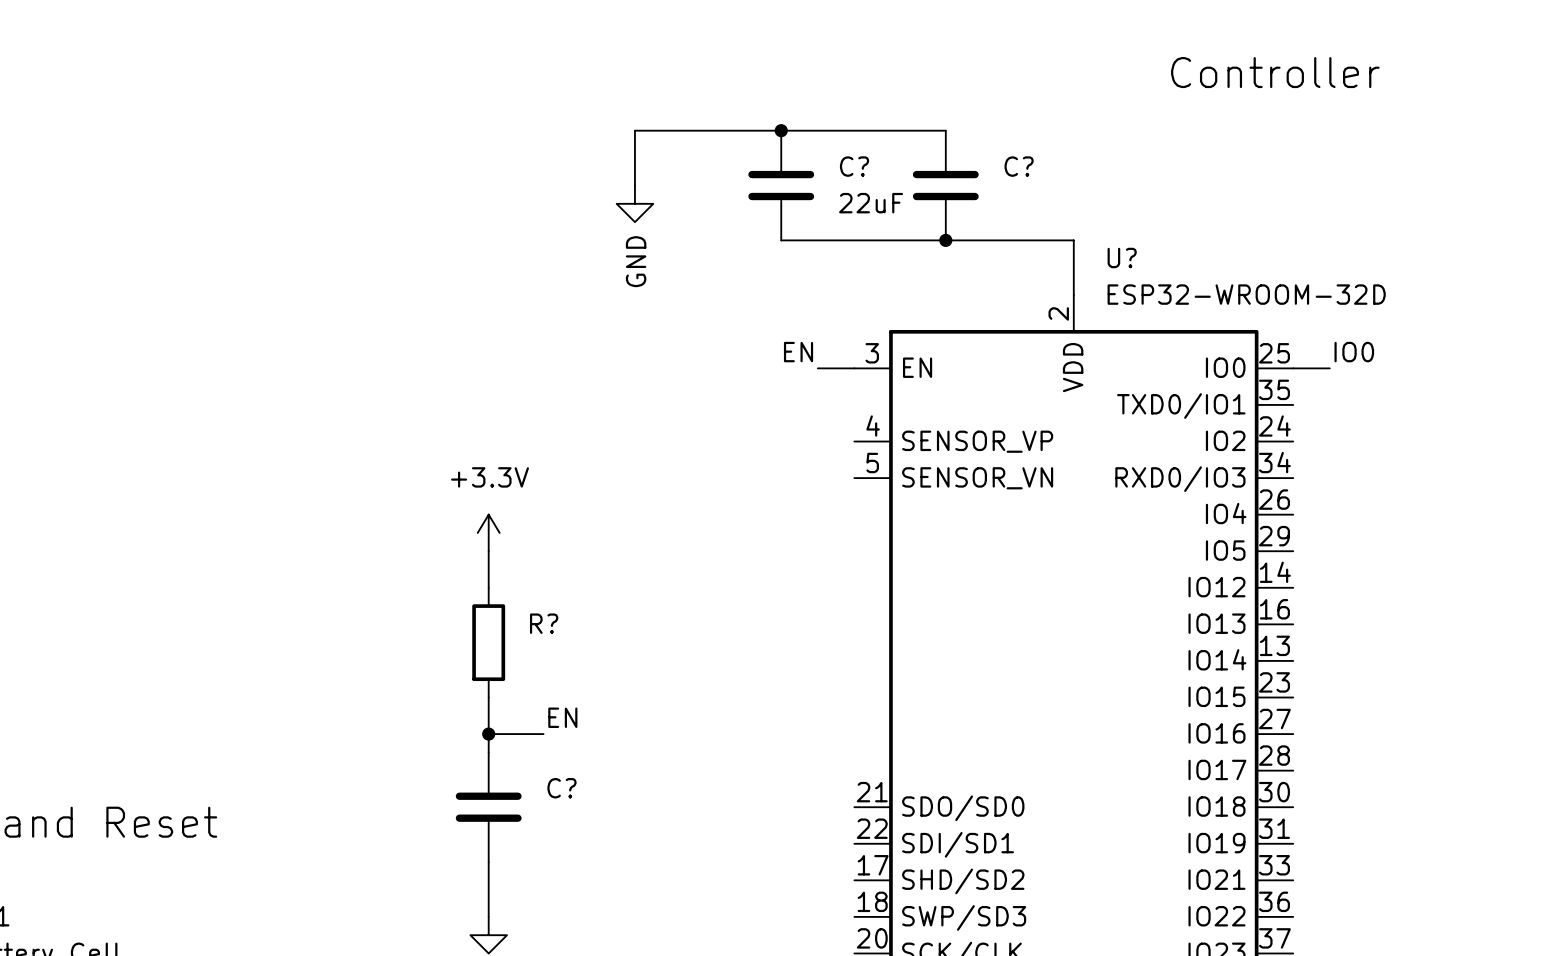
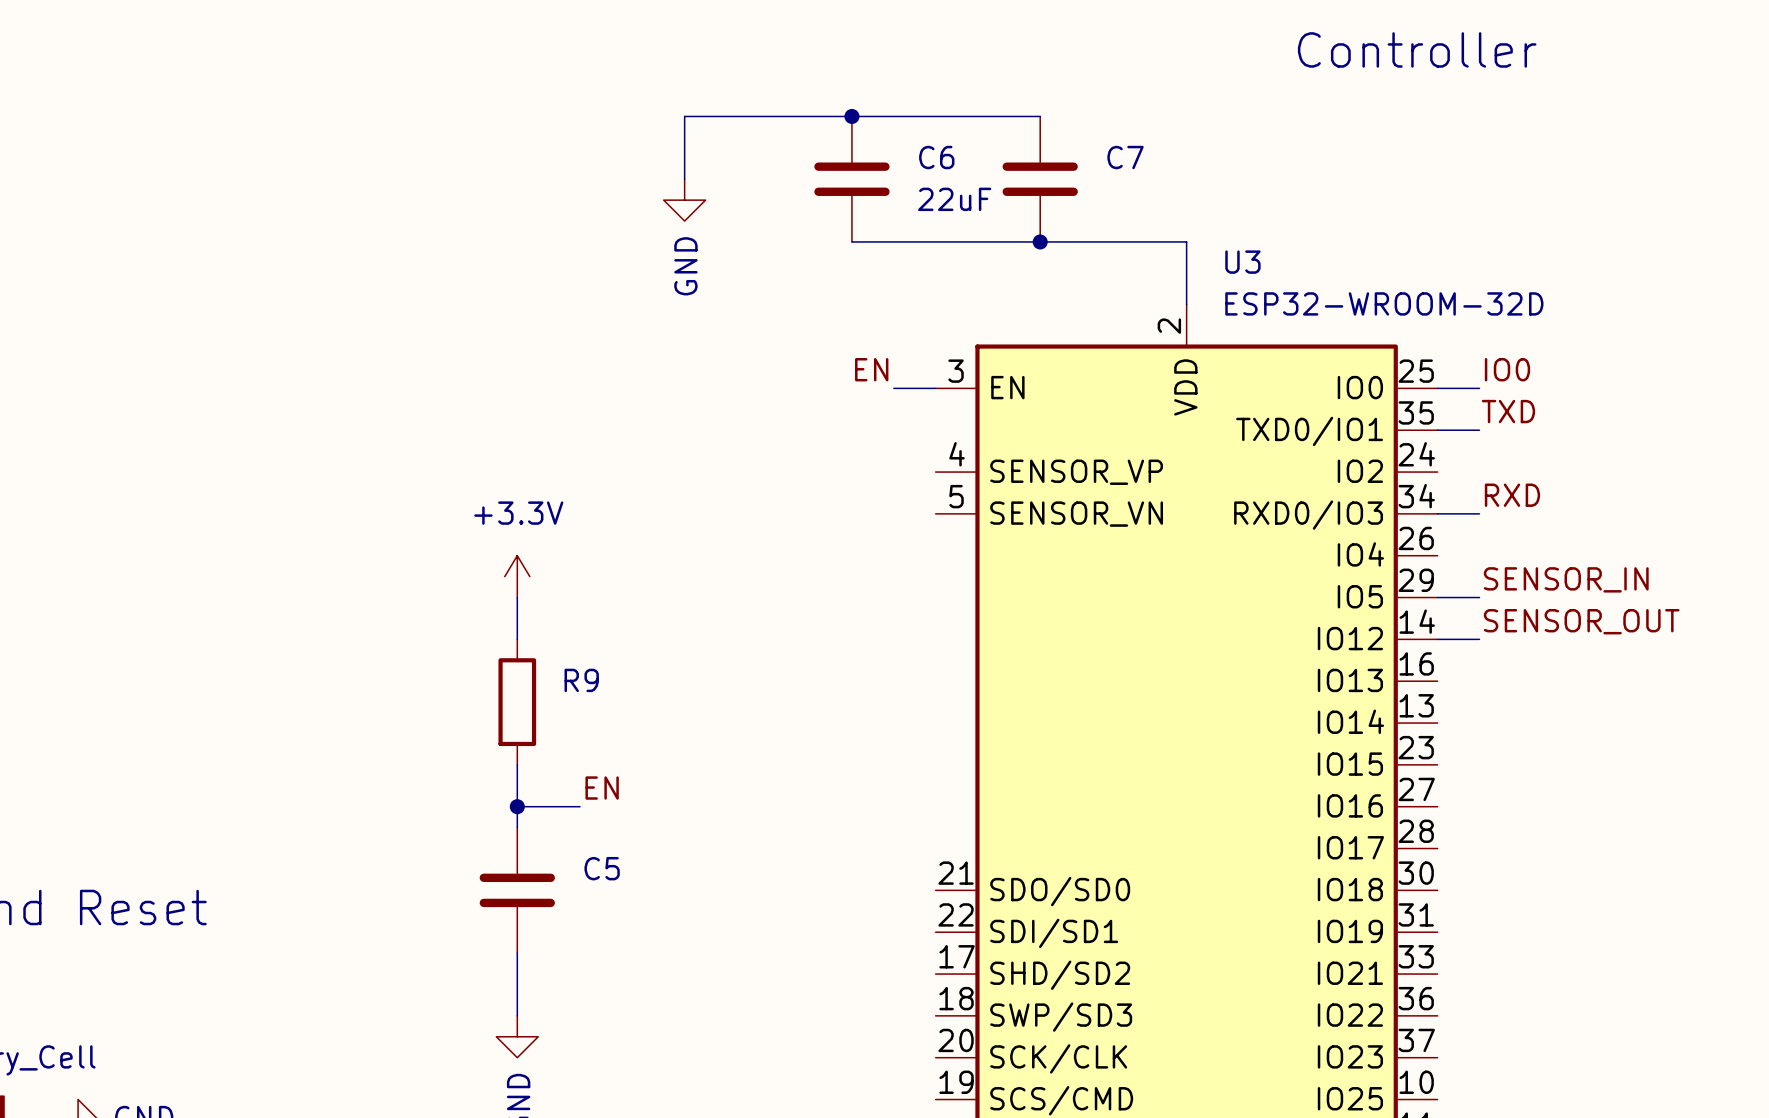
C? name: C? (854, 166) -> C6 (936, 157)
C? name: C? (1019, 166) -> C7 (1125, 157)
U? name: U? (1122, 257) -> U3 (1242, 262)
label: none -> TXD (1508, 411)
wire: none -> (1437, 430) (1479, 430)
label: none -> RXD (1512, 495)
wire: none -> (1437, 513) (1479, 513)
label: none -> SENSOR_IN (1566, 579)
wire: none -> (1437, 597) (1479, 597)
label: none -> SENSOR_OUT (1581, 621)
wire: none -> (1437, 639) (1479, 639)
R? name: R? (544, 623) -> R9 (581, 680)
C? name: C? (561, 788) -> C5 (602, 868)

